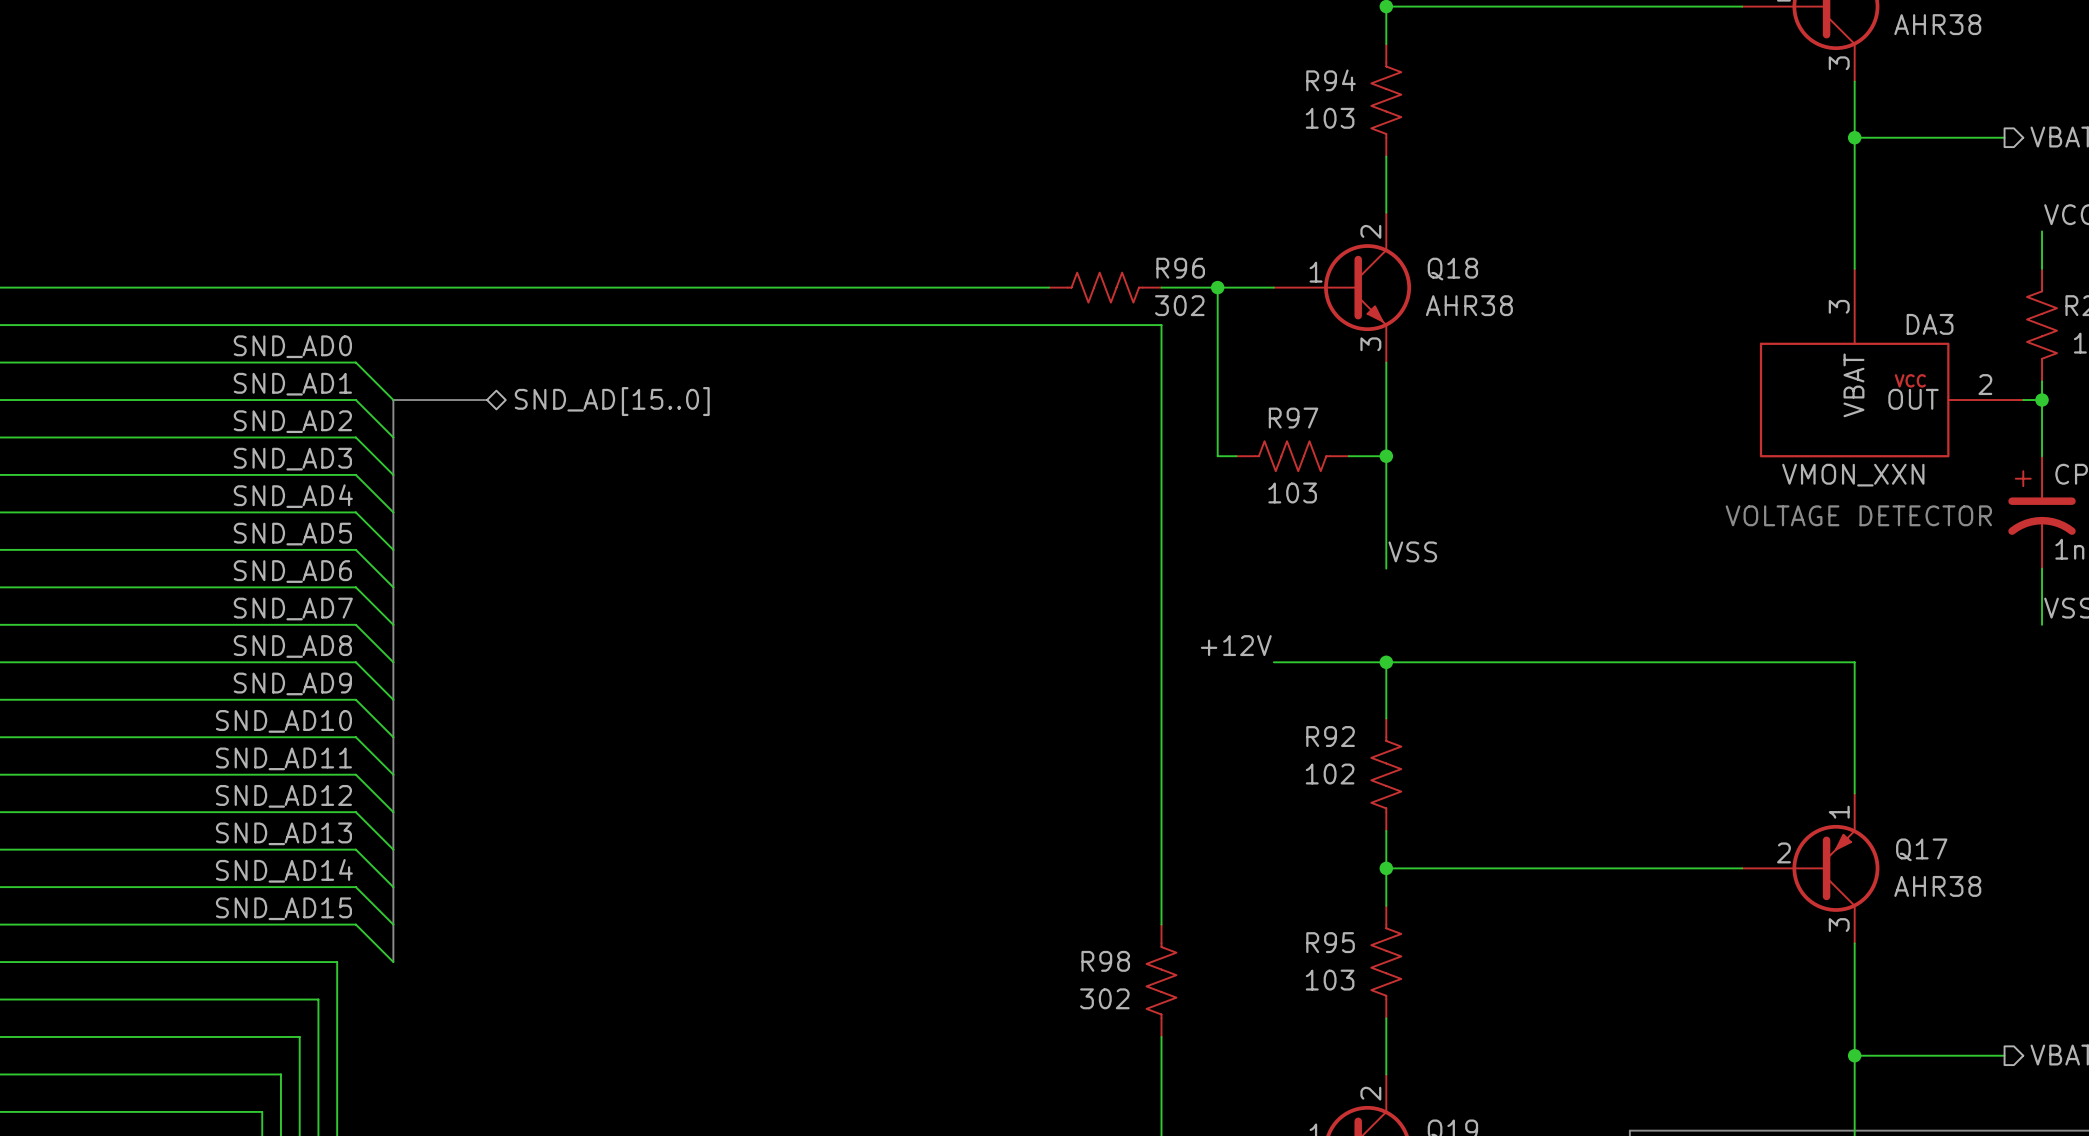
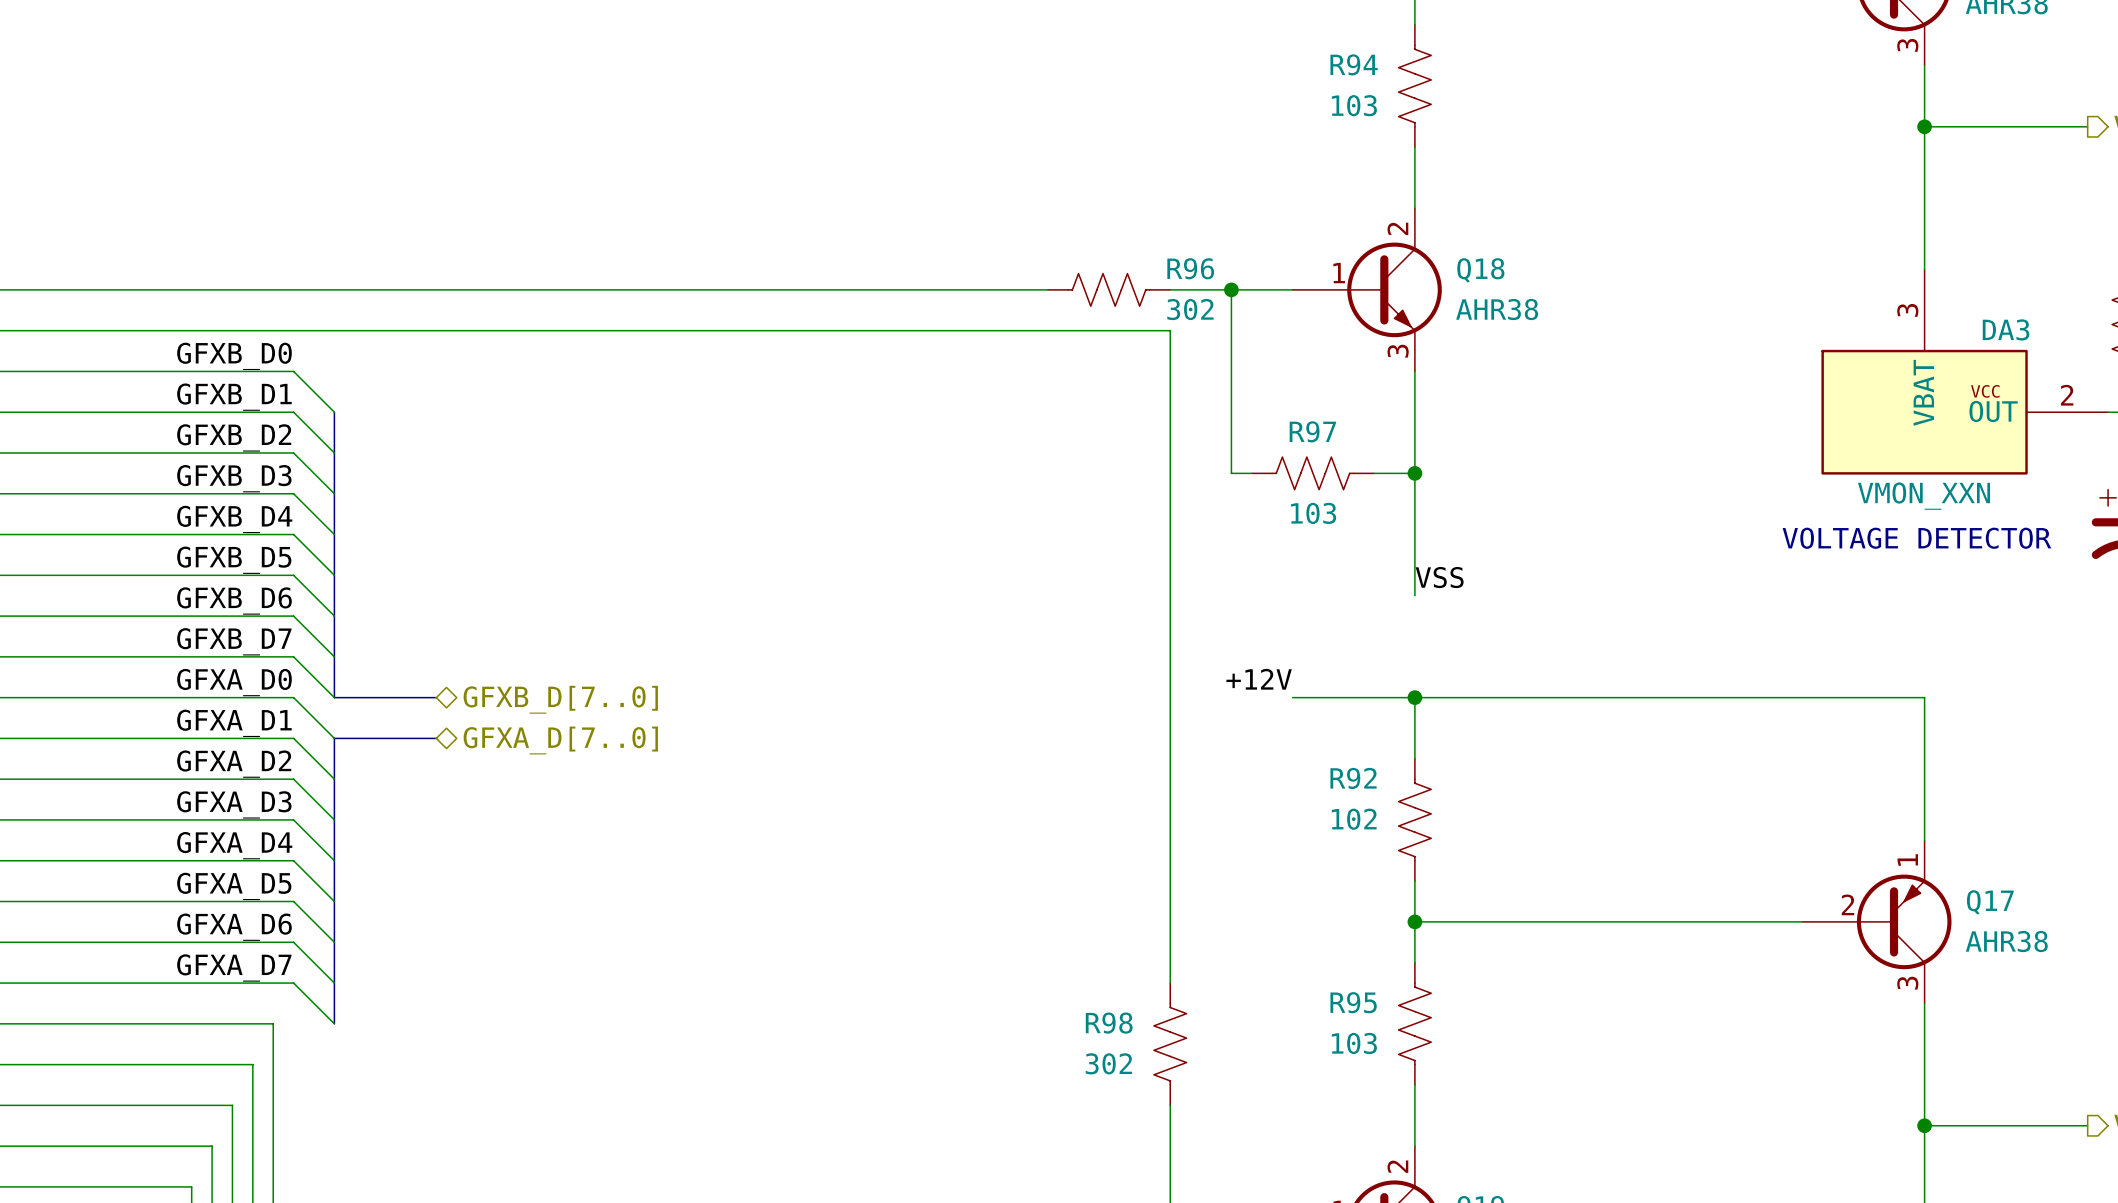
label: SND_AD0 (292, 346) -> GFXB_D0 (234, 356)
label: SND_AD1 (292, 384) -> GFXB_D1 (234, 397)
bus: (393, 400) (487, 400) -> (334, 738) (436, 738)
hierarchical label: SND_AD[15..0] (612, 401) -> none
label: SND_AD2 (292, 421) -> GFXB_D2 (234, 437)
label: SND_AD3 (292, 459) -> GFXB_D3 (234, 478)
label: SND_AD4 (293, 496) -> GFXB_D4 (234, 519)
label: SND_AD5 (292, 534) -> GFXB_D5 (234, 560)
label: SND_AD6 (292, 571) -> GFXB_D6 (234, 601)
label: SND_AD7 (293, 609) -> GFXB_D7 (234, 641)
label: SND_AD8 (292, 646) -> GFXA_D0 (234, 682)
bus: (393, 662) (393, 699) -> (334, 697) (436, 697)
hierarchical label: none -> GFXB_D[7..0] (560, 699)
label: SND_AD9 (292, 683) -> GFXA_D1 (234, 723)
hierarchical label: none -> GFXA_D[7..0] (560, 740)
label: SND_AD10 (283, 721) -> GFXA_D2 (234, 764)
label: SND_AD11 (283, 758) -> GFXA_D3 (234, 804)
label: SND_AD12 (283, 796) -> GFXA_D4 (234, 845)
label: SND_AD13 (283, 833) -> GFXA_D5 (234, 886)
label: SND_AD14 (284, 870) -> GFXA_D6 (234, 927)
label: SND_AD15 (283, 908) -> GFXA_D7 (234, 967)

